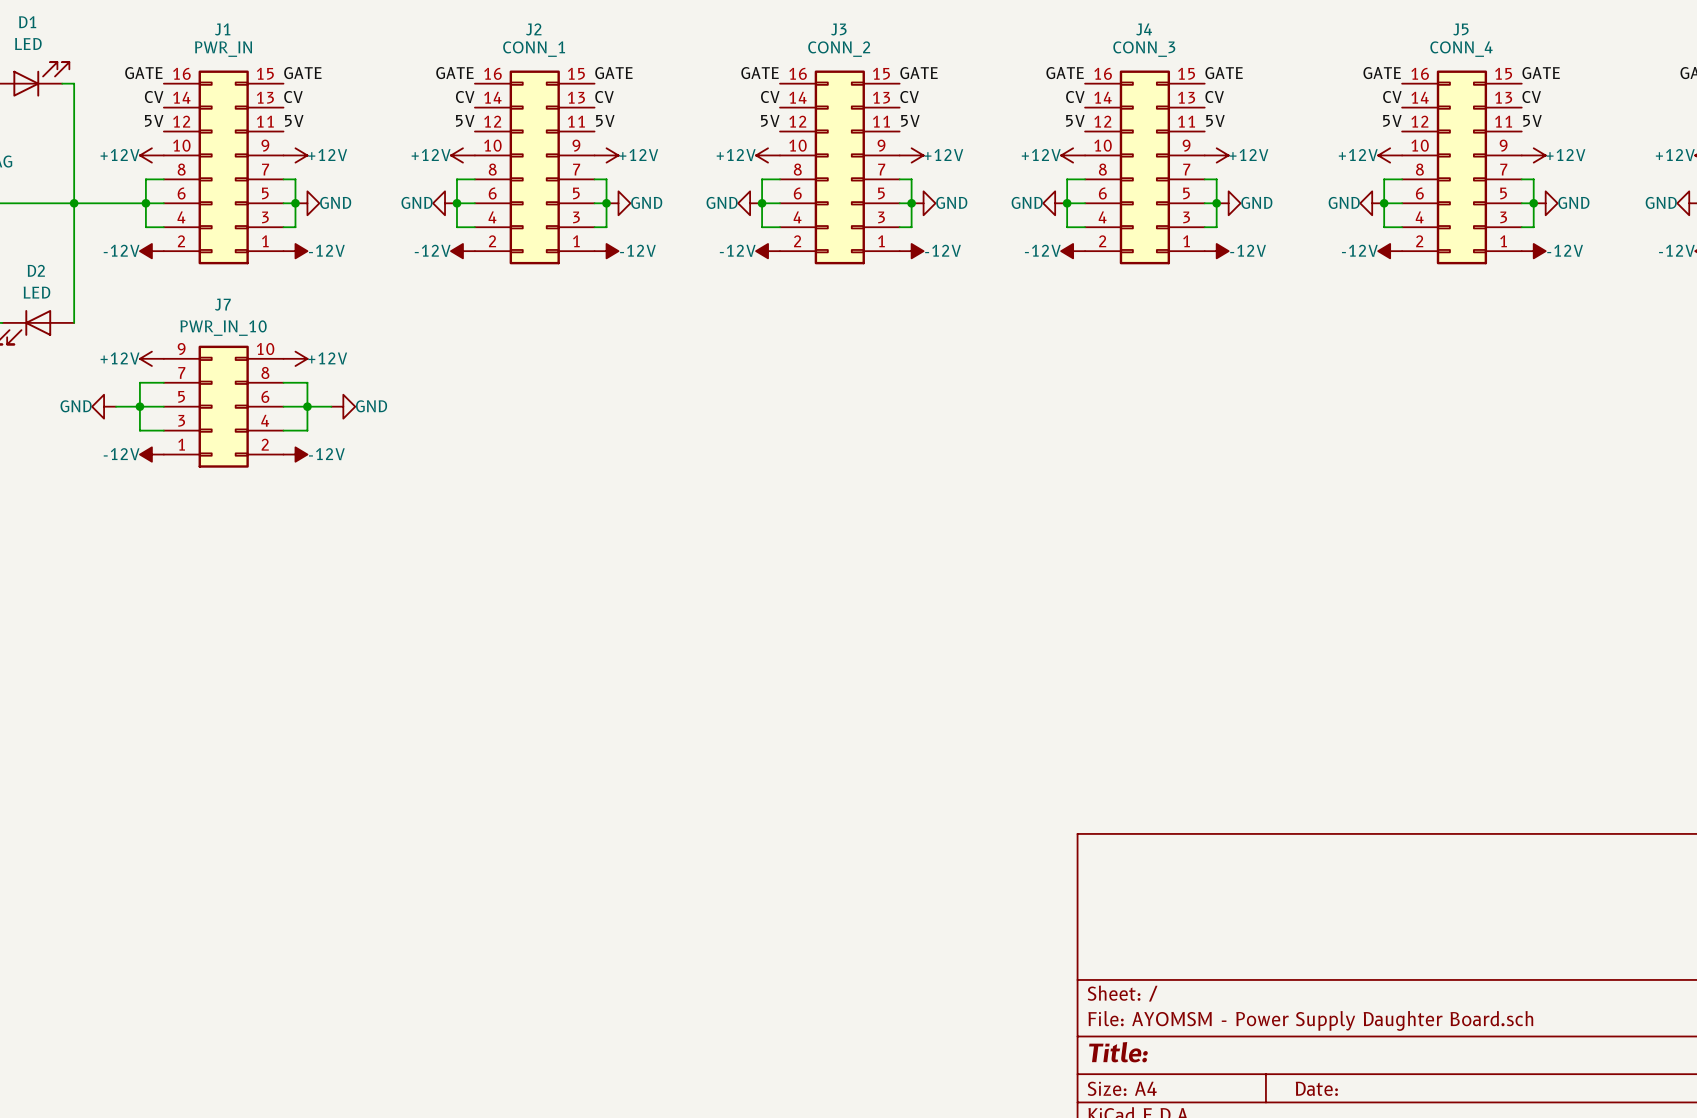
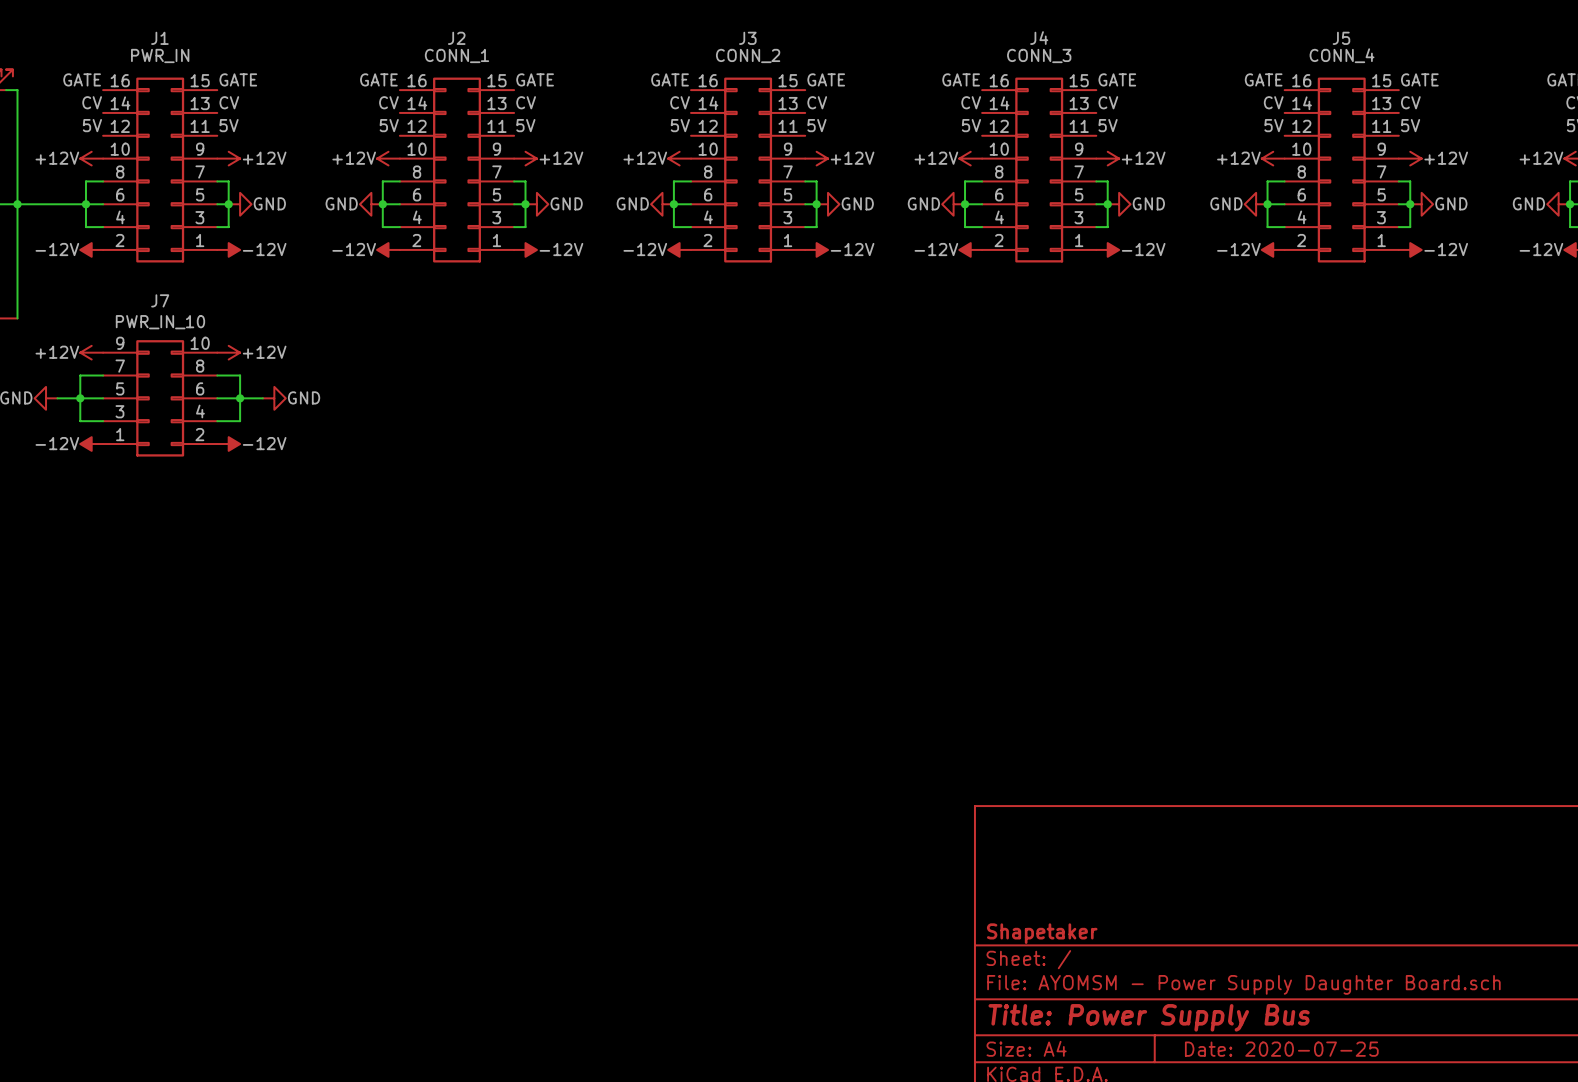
title block: none -> Shapetaker (1042, 933)
title block: Title: (1118, 1052) -> Title: Power Supply Bus (1149, 1017)
title block: Date: (1316, 1088) -> Date: 2020-07-25 (1281, 1049)

